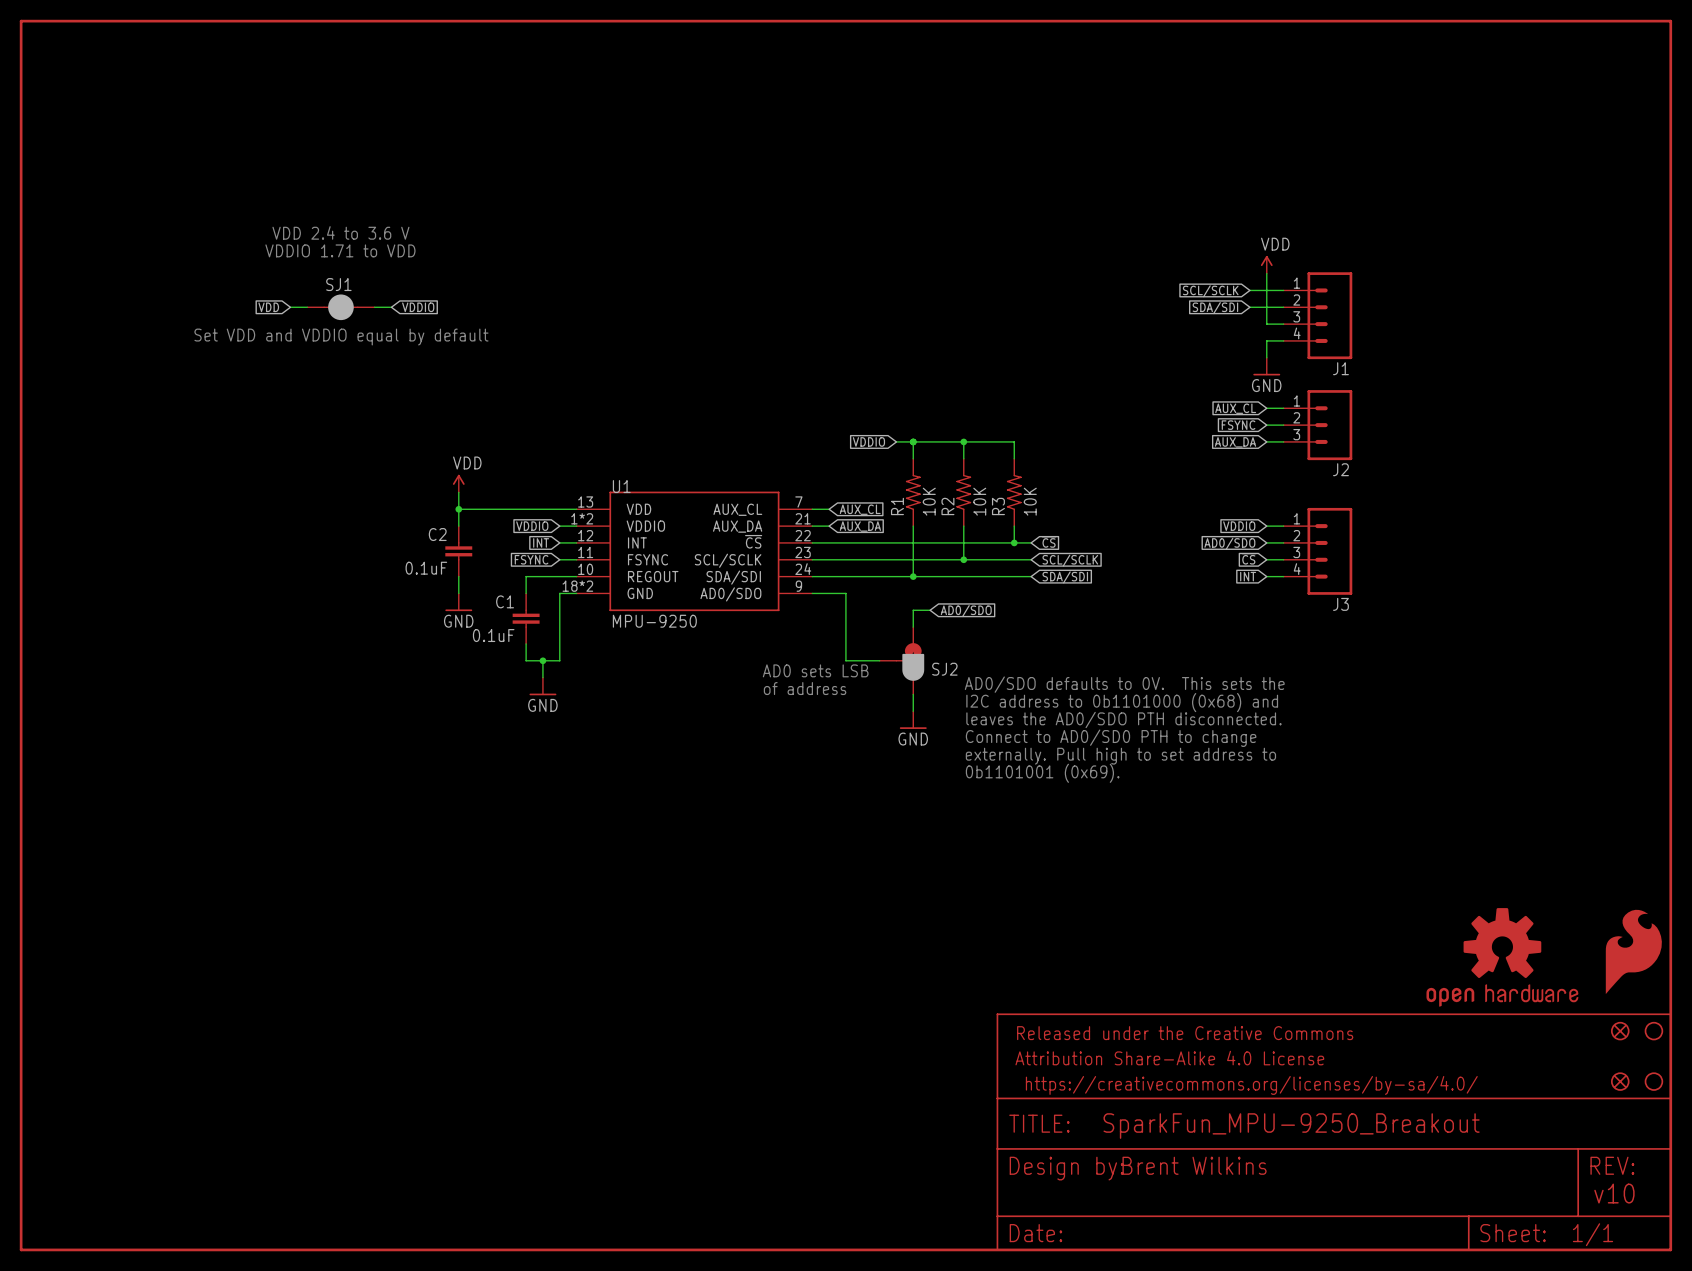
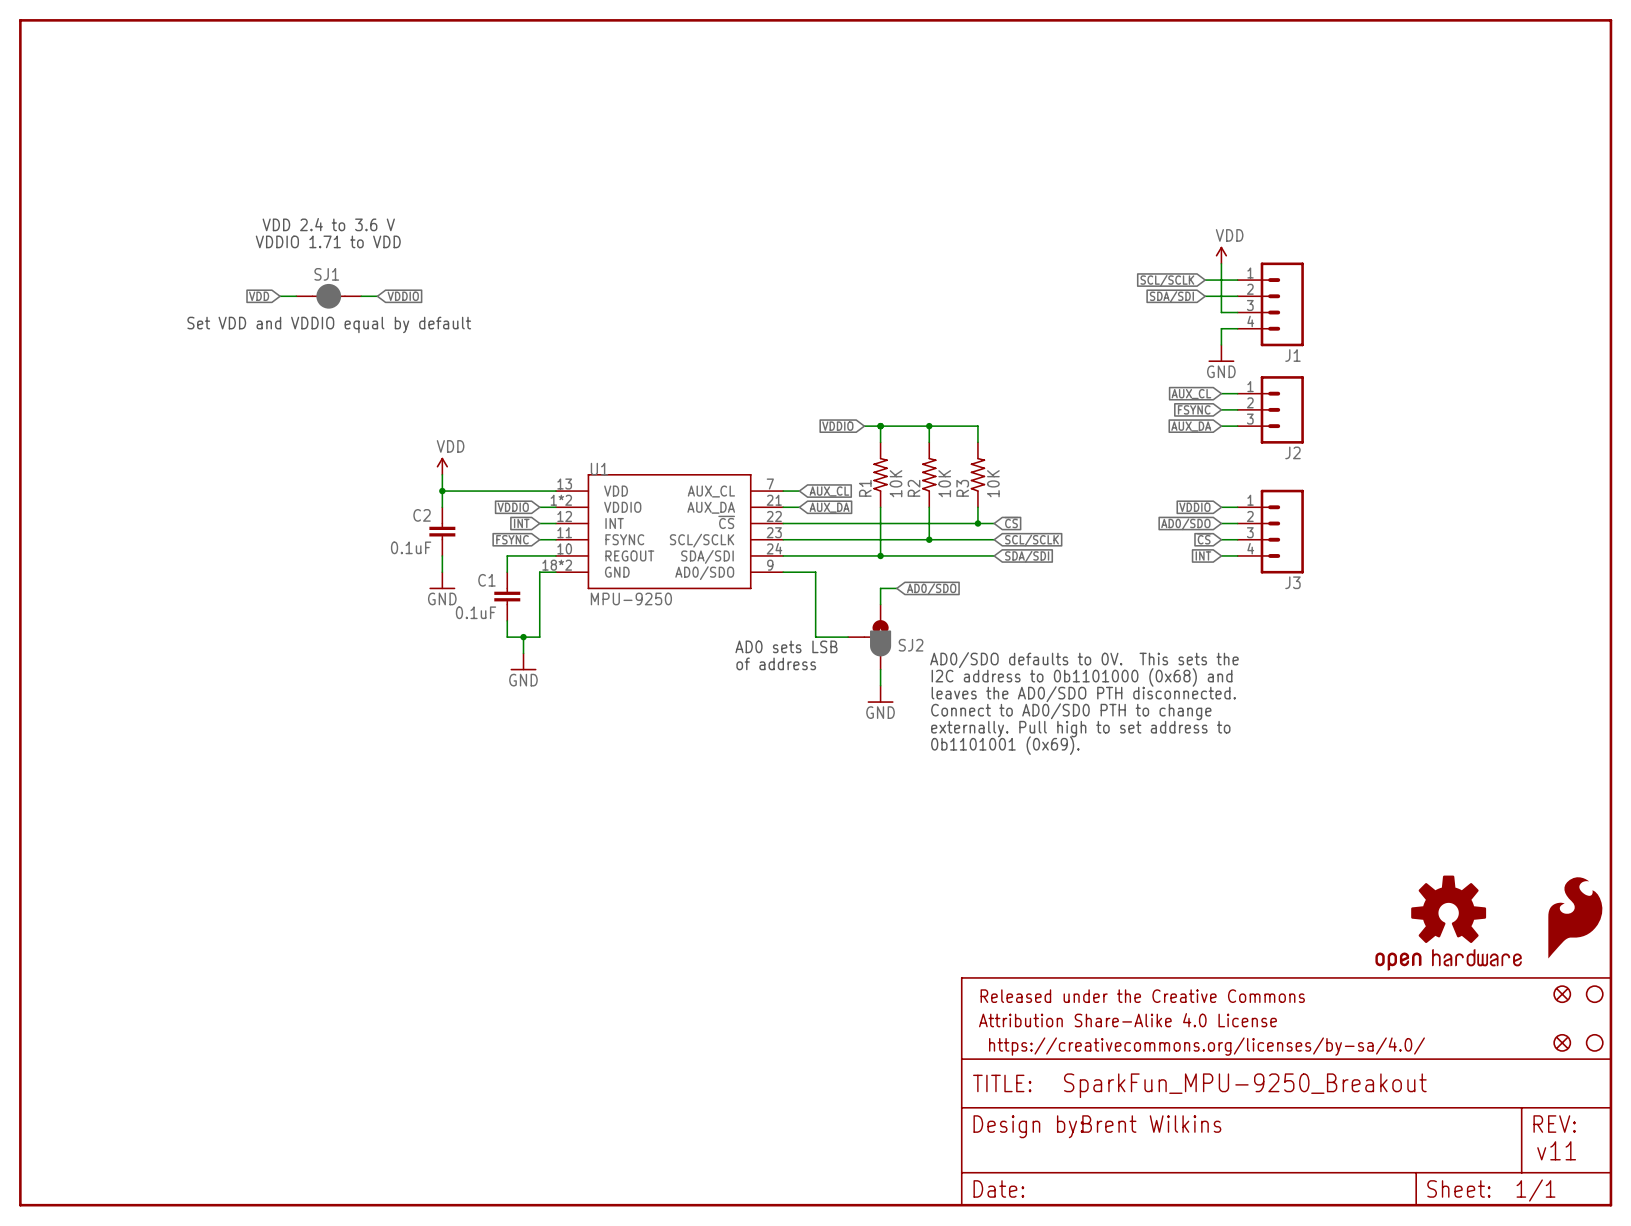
text: v10 (1614, 1193) -> v11 (1556, 1150)

